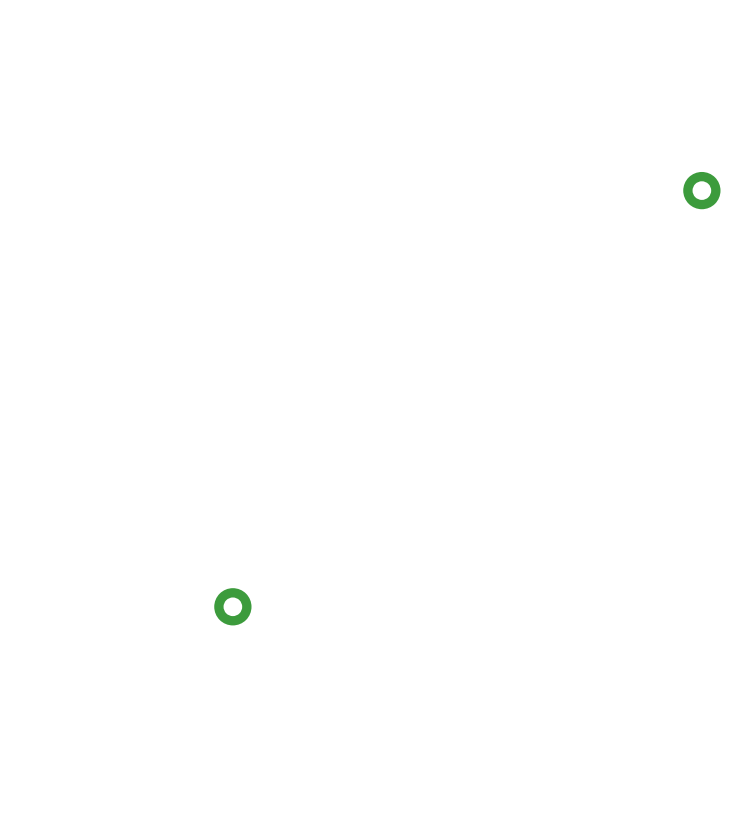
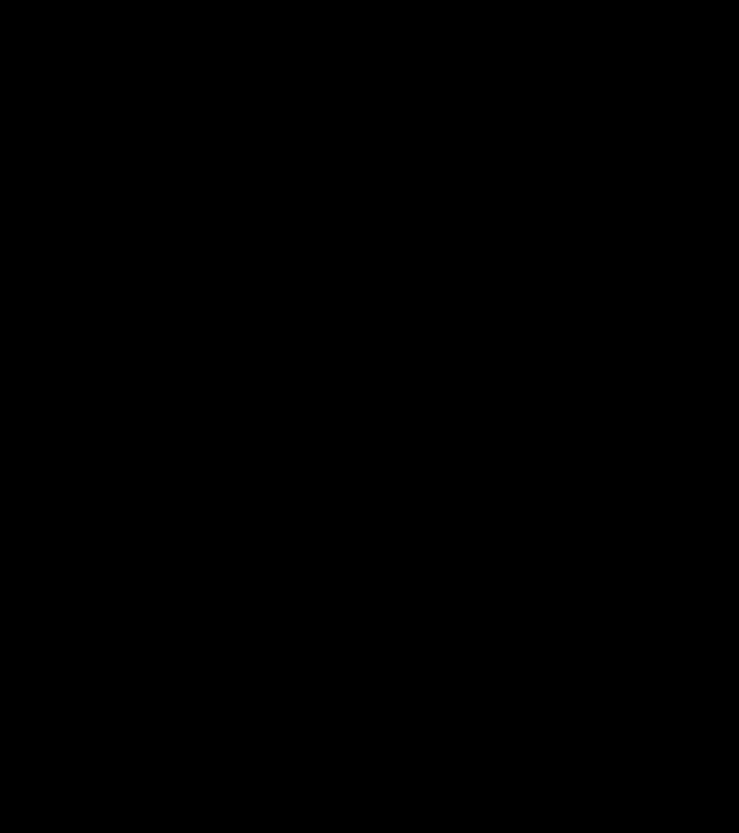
via: (701, 190) -> none
via: (232, 606) -> none

